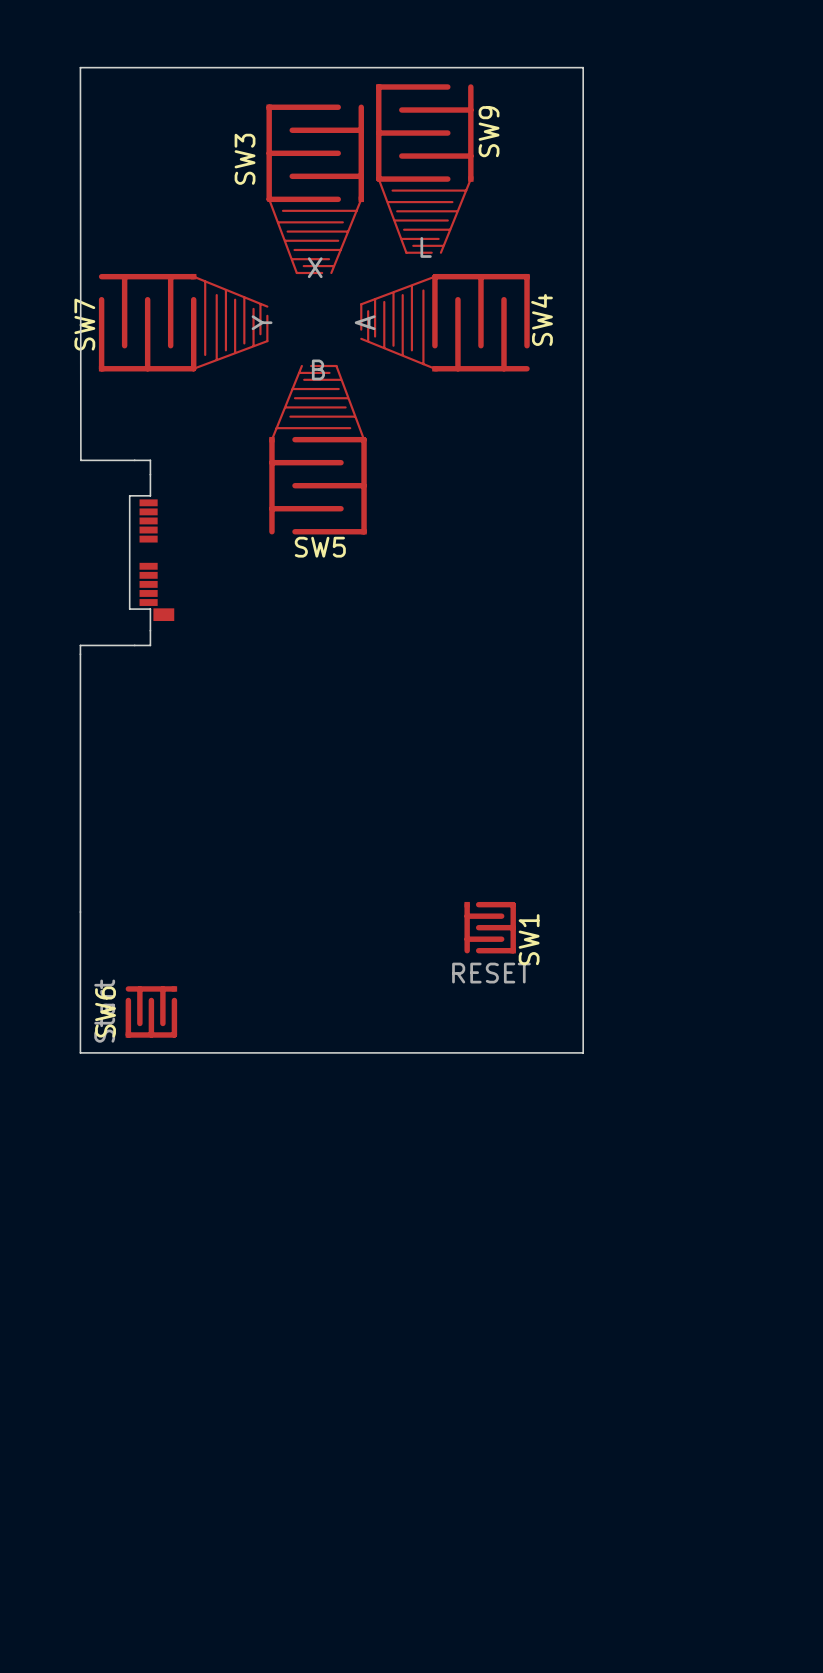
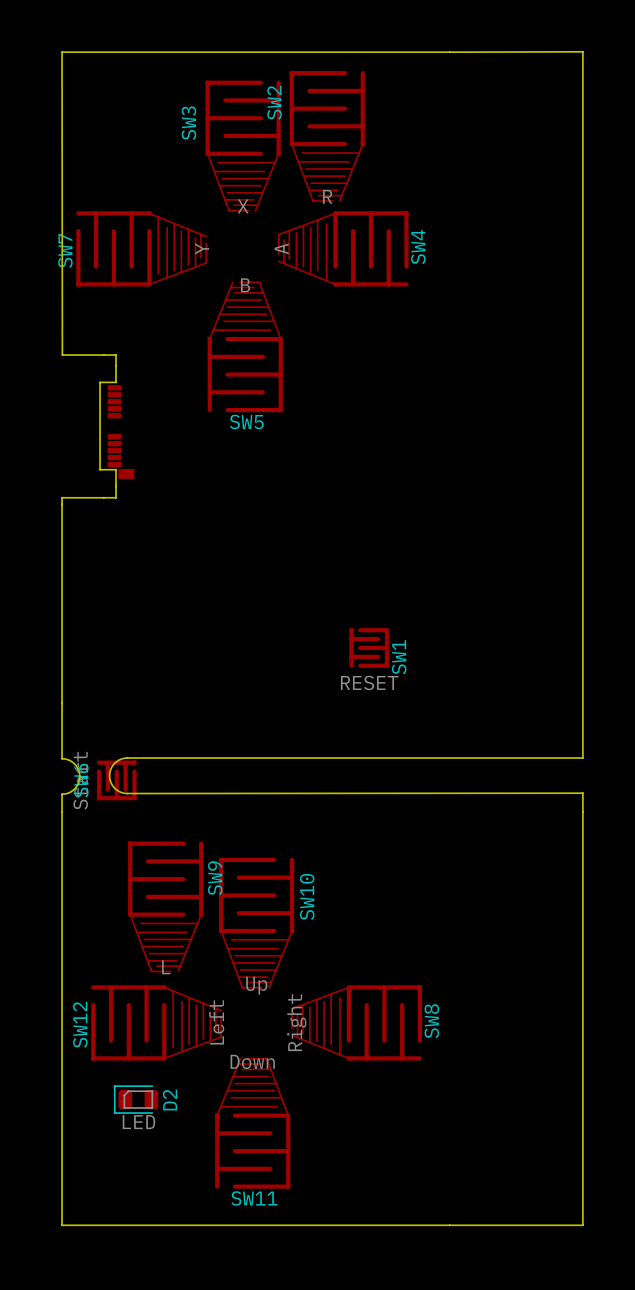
board edge: (583, 67) (583, 1052) (80, 1052) -> (449, 52) (582, 51) (582, 758) (127, 758) (120, 759) (113, 764) (109, 778) (116, 789) (127, 793) (582, 793) (582, 1225) (62, 1225) (62, 812)
SW9 position: (424, 169) -> (165, 906)
SW2: none -> R (327, 136)
SW1 position: (490, 927) -> (369, 647)
board edge: (80, 983) (80, 1029) -> (62, 758) (74, 763) (79, 776) (74, 789) (62, 794)
SW10: none -> Up (256, 923)
SW12: none -> Left (156, 1022)
SW8: none -> Right (356, 1022)
D2: none -> LED (136, 1099)
SW11: none -> Down (252, 1123)

